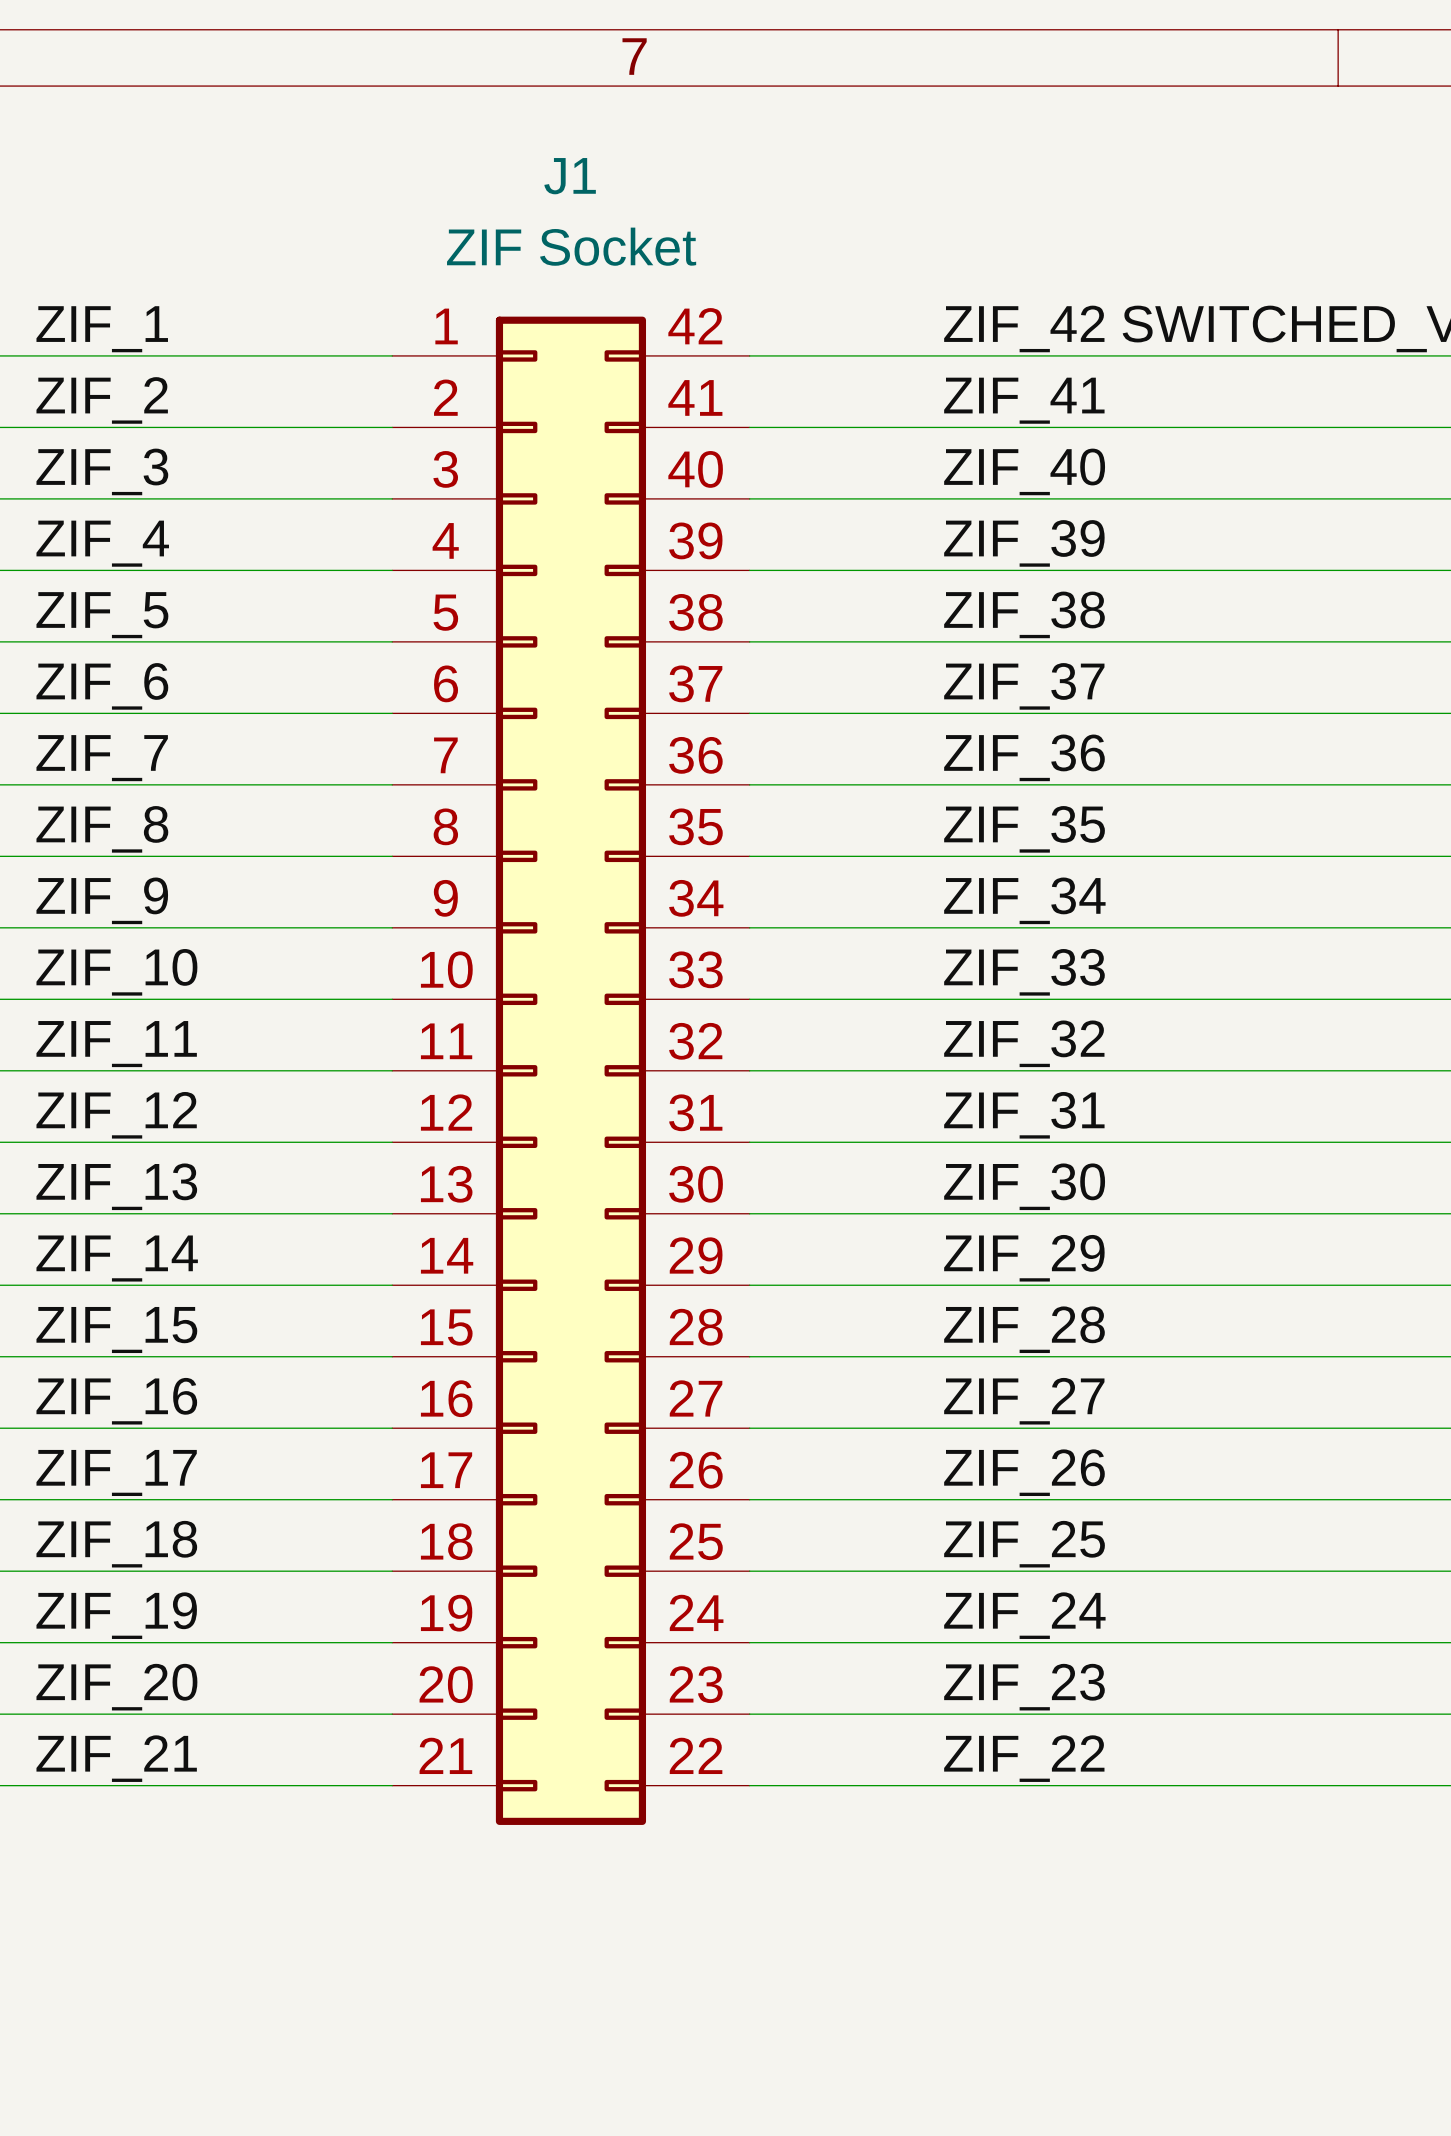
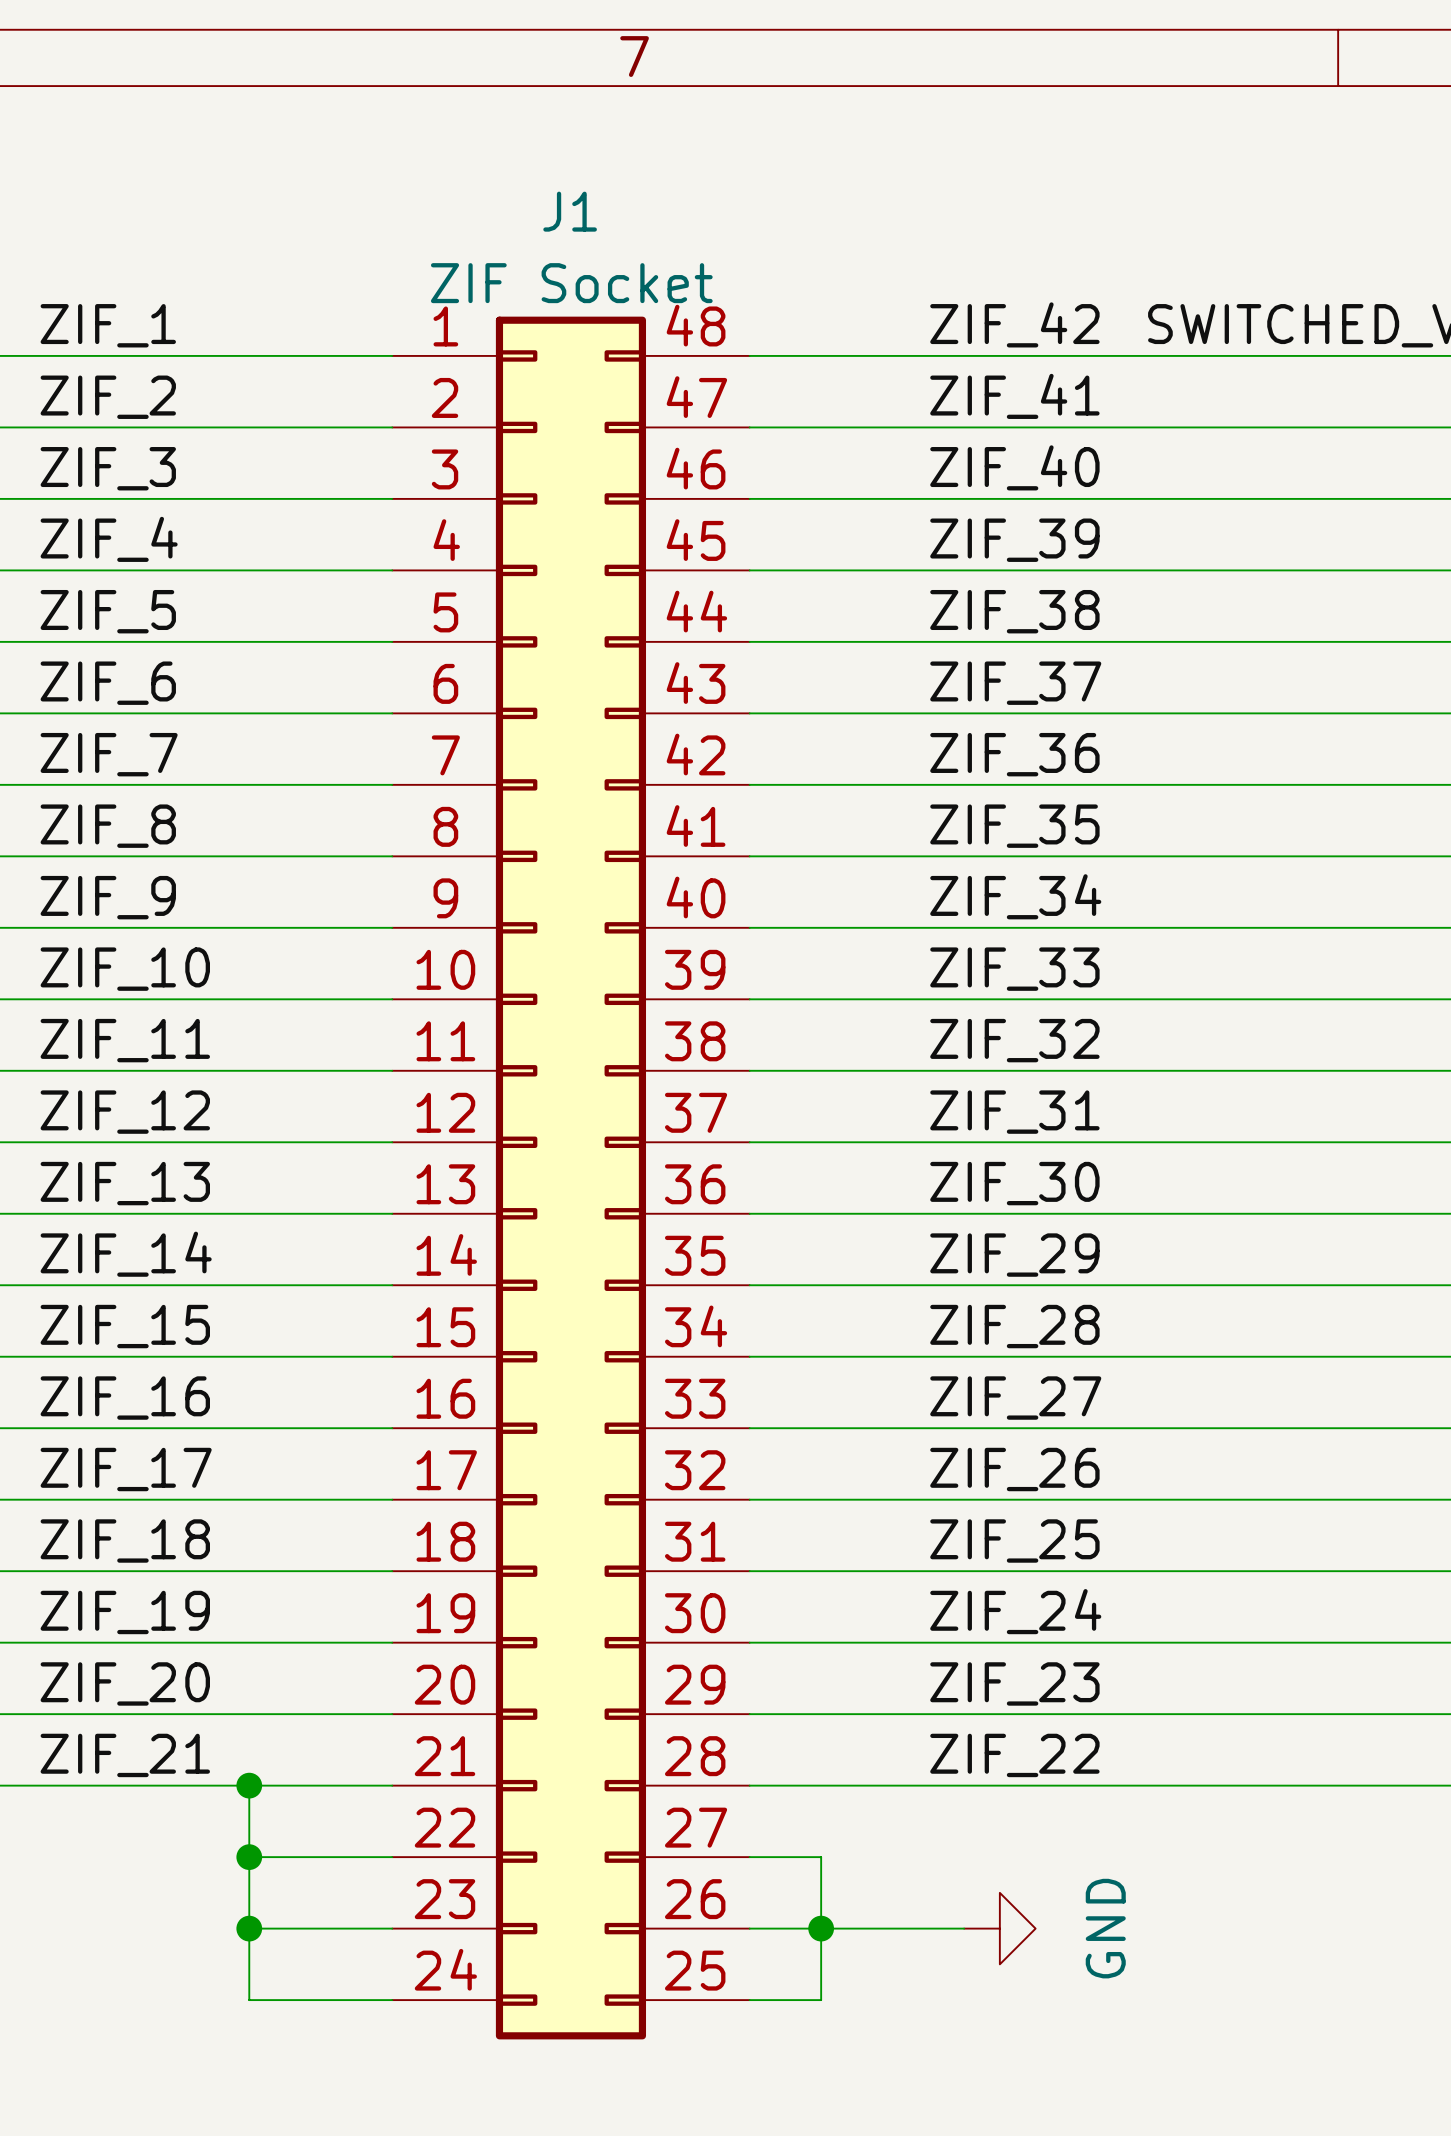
J1 name position: J1 (570, 176) -> J1 (570, 211)
J1 value position: ZIF Socket (571, 246) -> ZIF Socket (571, 283)
J1 symbol: [392, 316, 750, 1825] -> [392, 316, 750, 2040]
wire: none -> (249, 1785) (249, 2000) (392, 2000)
junction: none -> (249, 1785)
wire: none -> (249, 1857) (392, 1857)
junction: none -> (249, 1857)
wire: none -> (749, 1857) (821, 1857) (821, 2000) (749, 2000)
wire: none -> (249, 1928) (392, 1928)
junction: none -> (249, 1928)
wire: none -> (749, 1928) (964, 1928)
junction: none -> (821, 1928)
power symbol: none -> GND (999, 1928)

